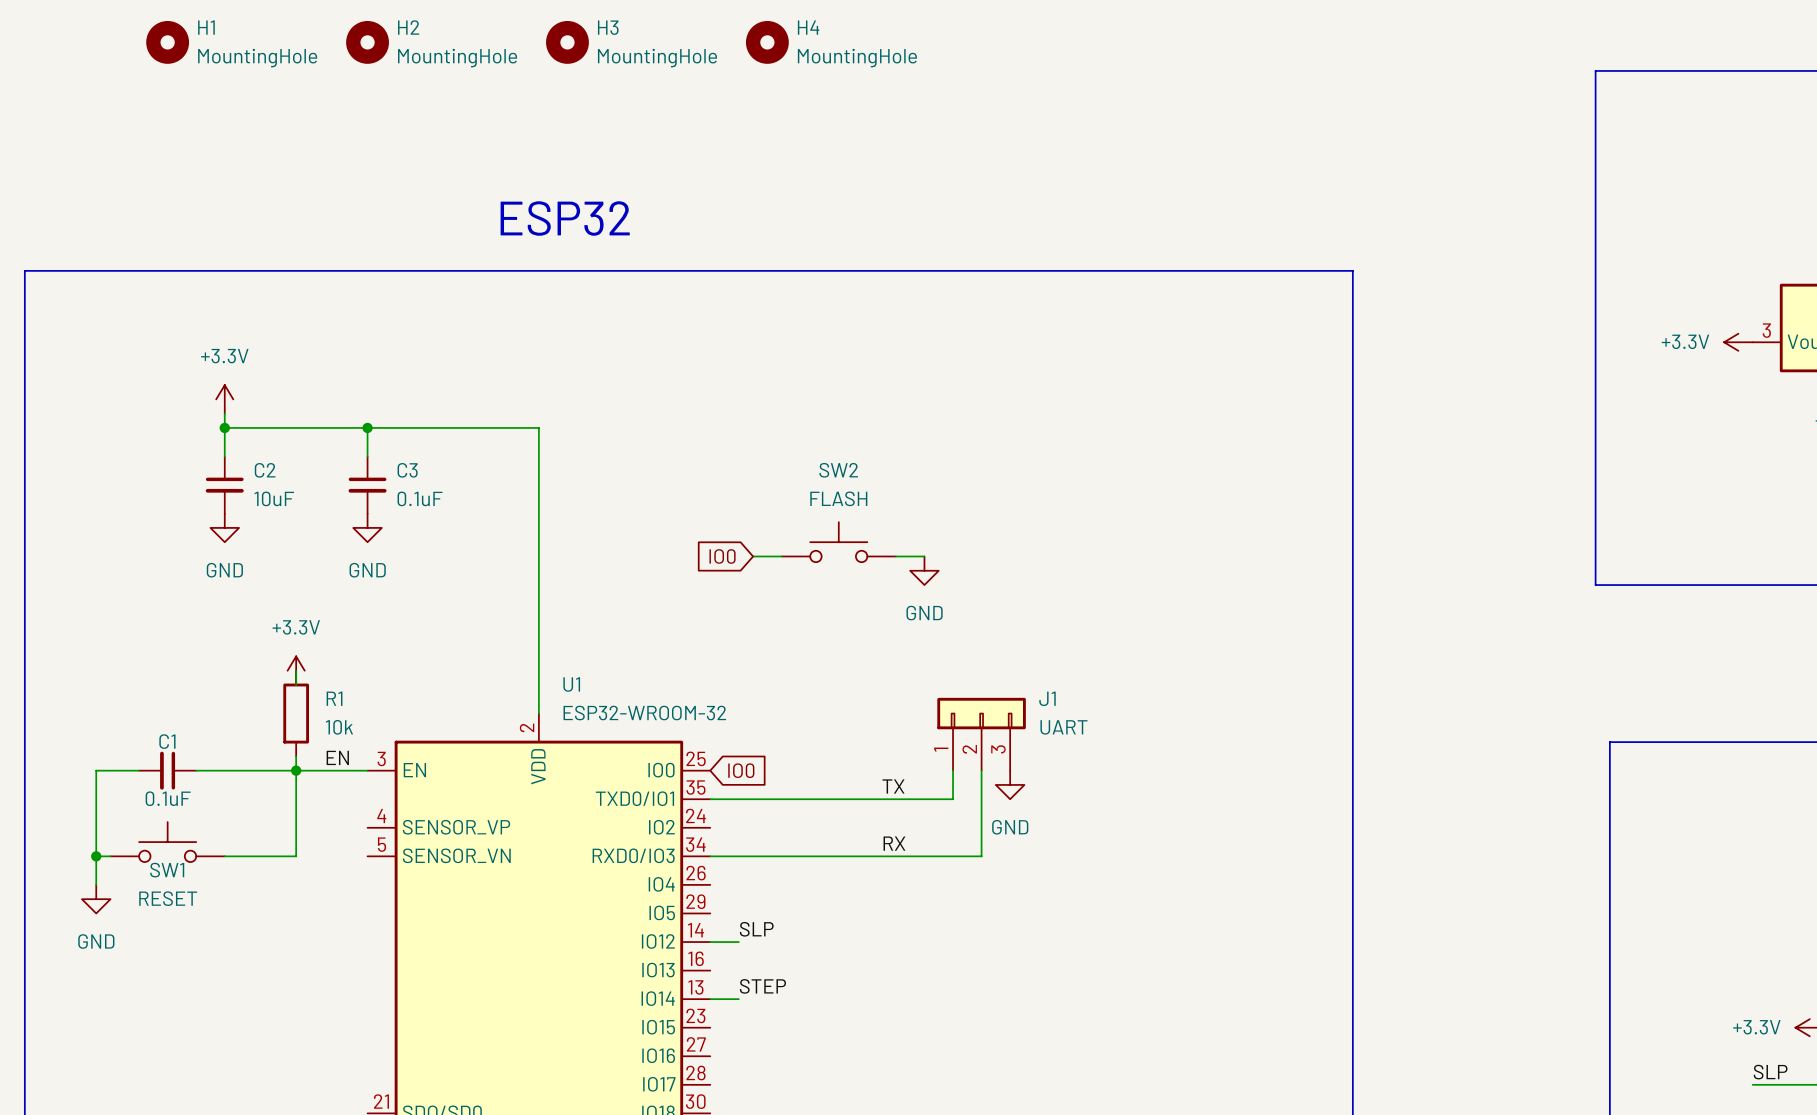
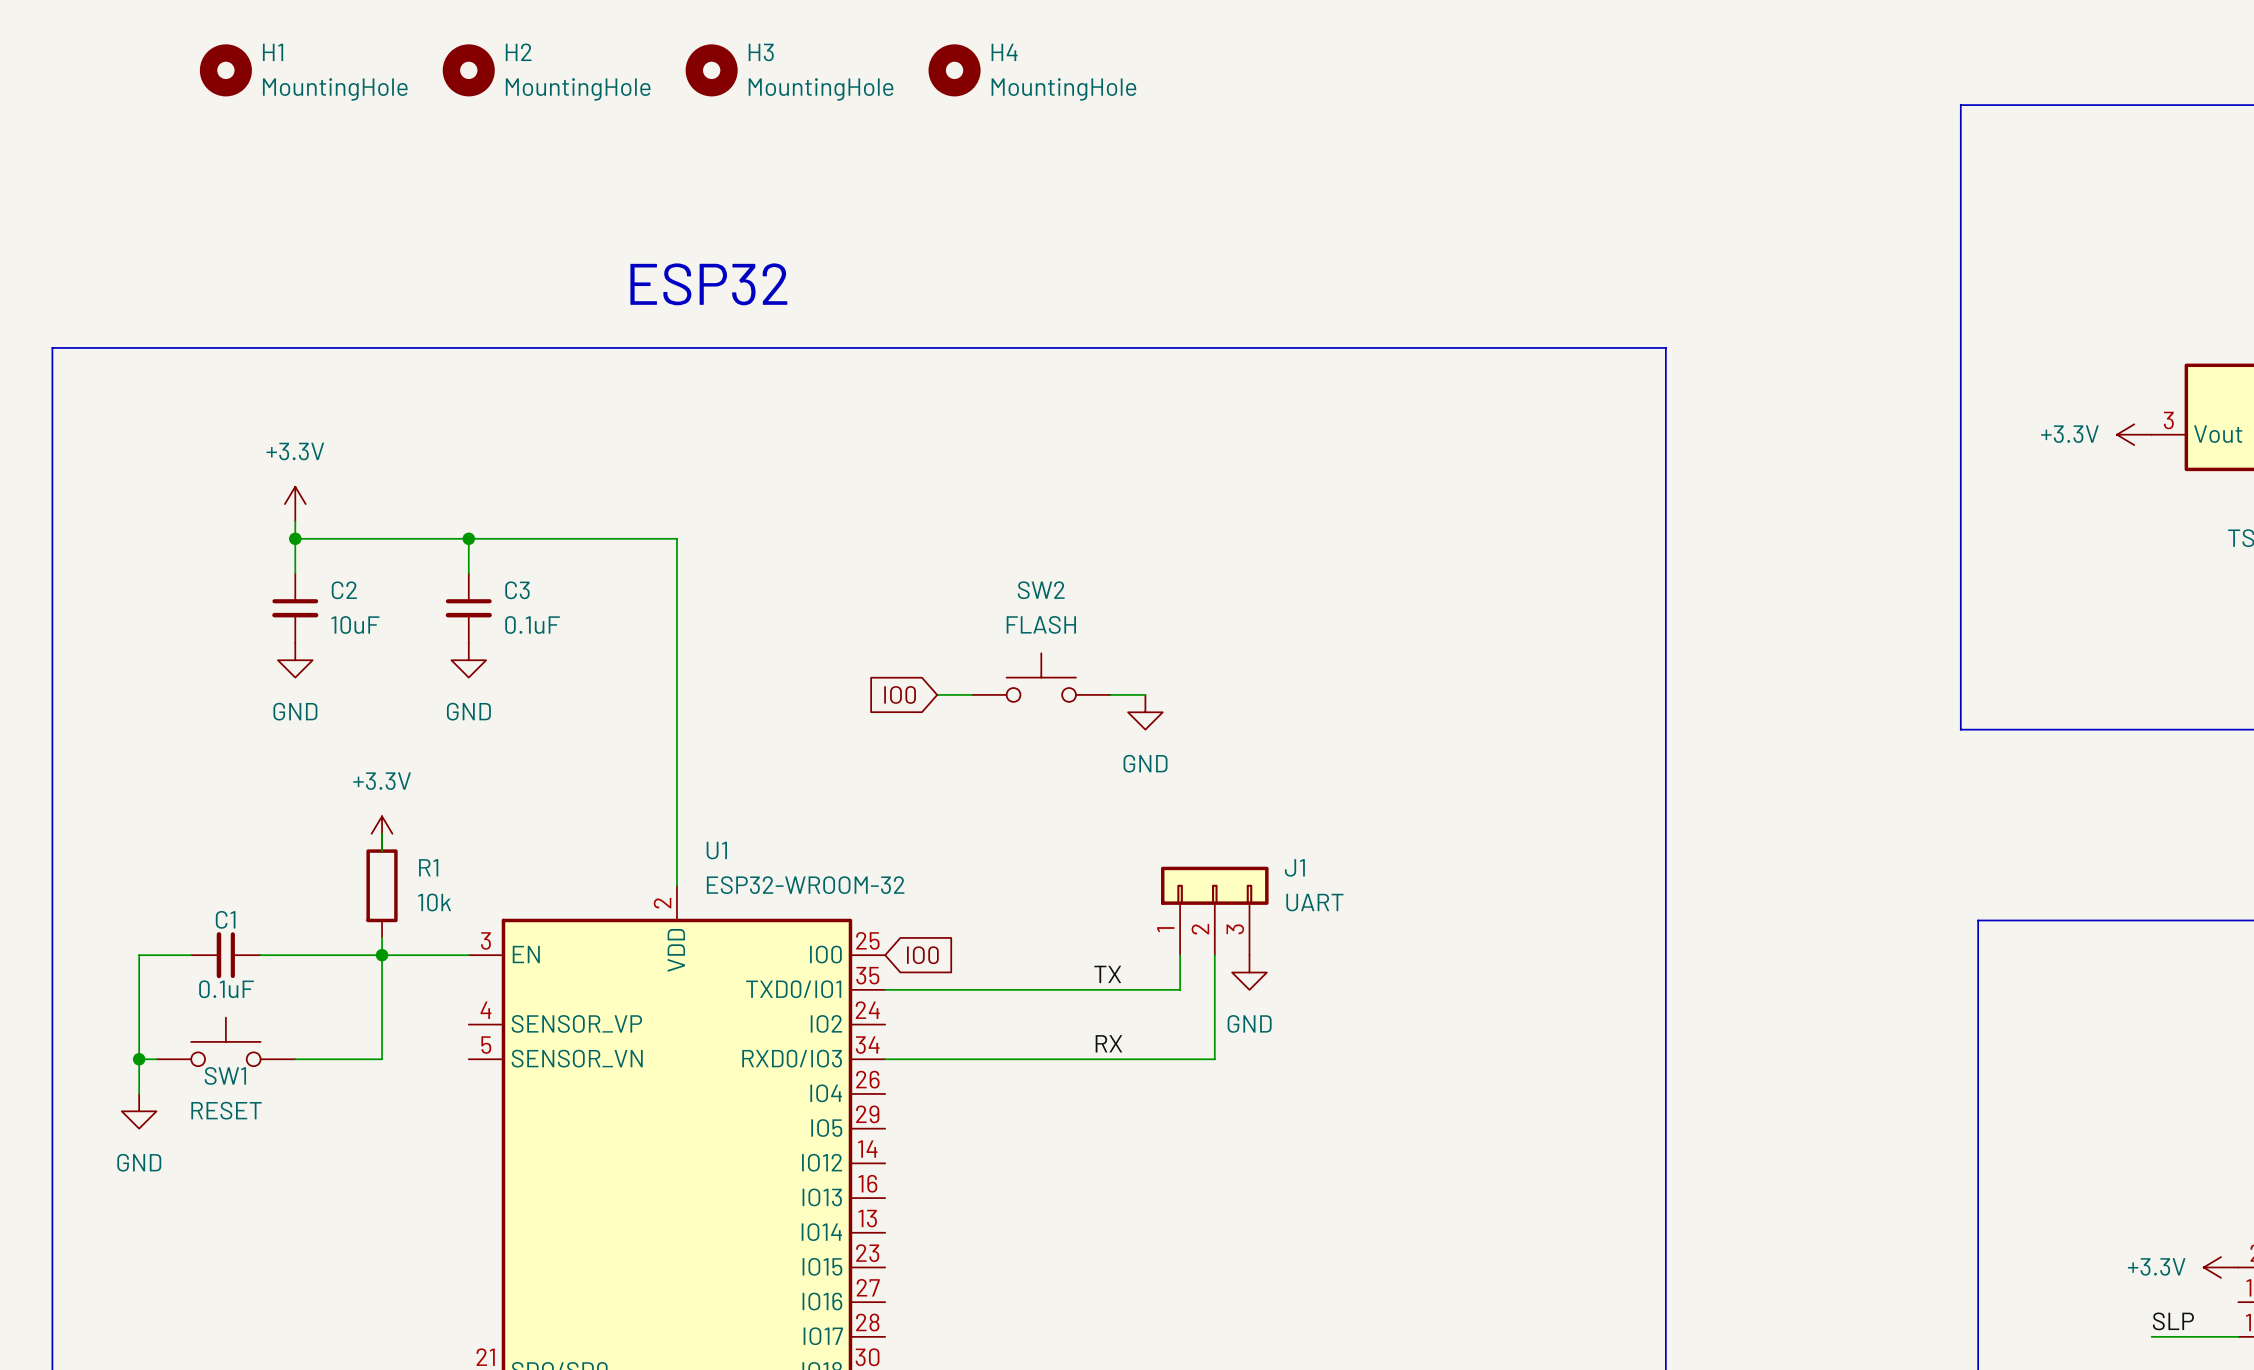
label: EN (337, 757) -> none
label: SLP (756, 929) -> none
wire: (710, 942) (738, 942) -> none
label: STEP (762, 986) -> none
wire: (710, 999) (738, 999) -> none

